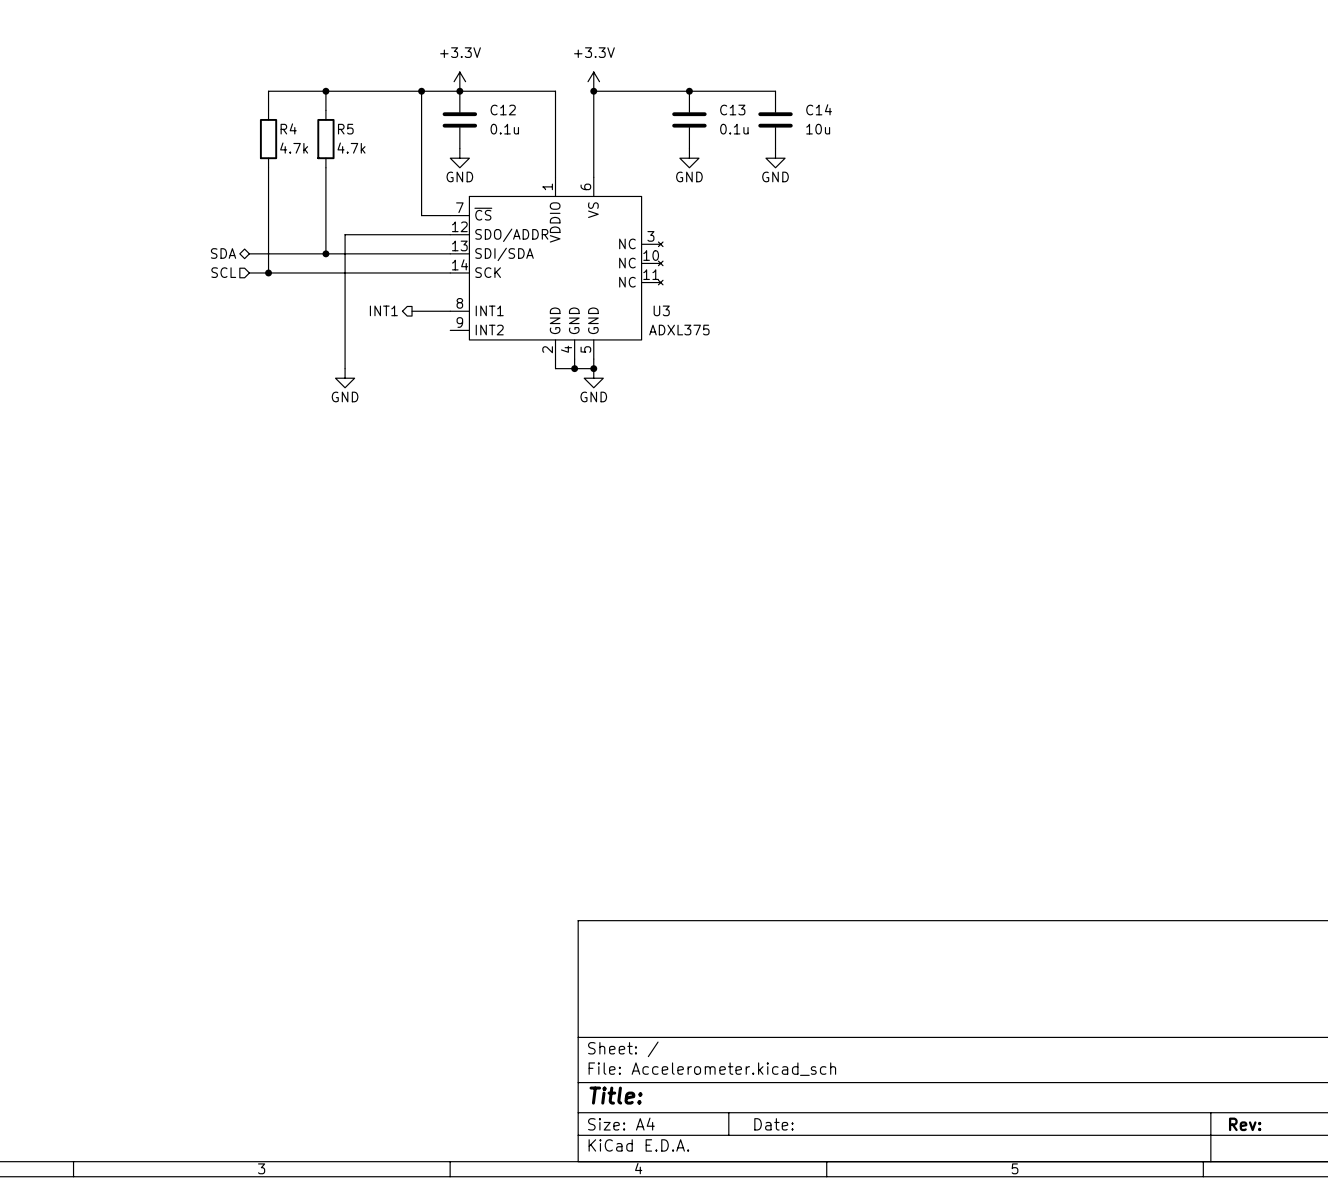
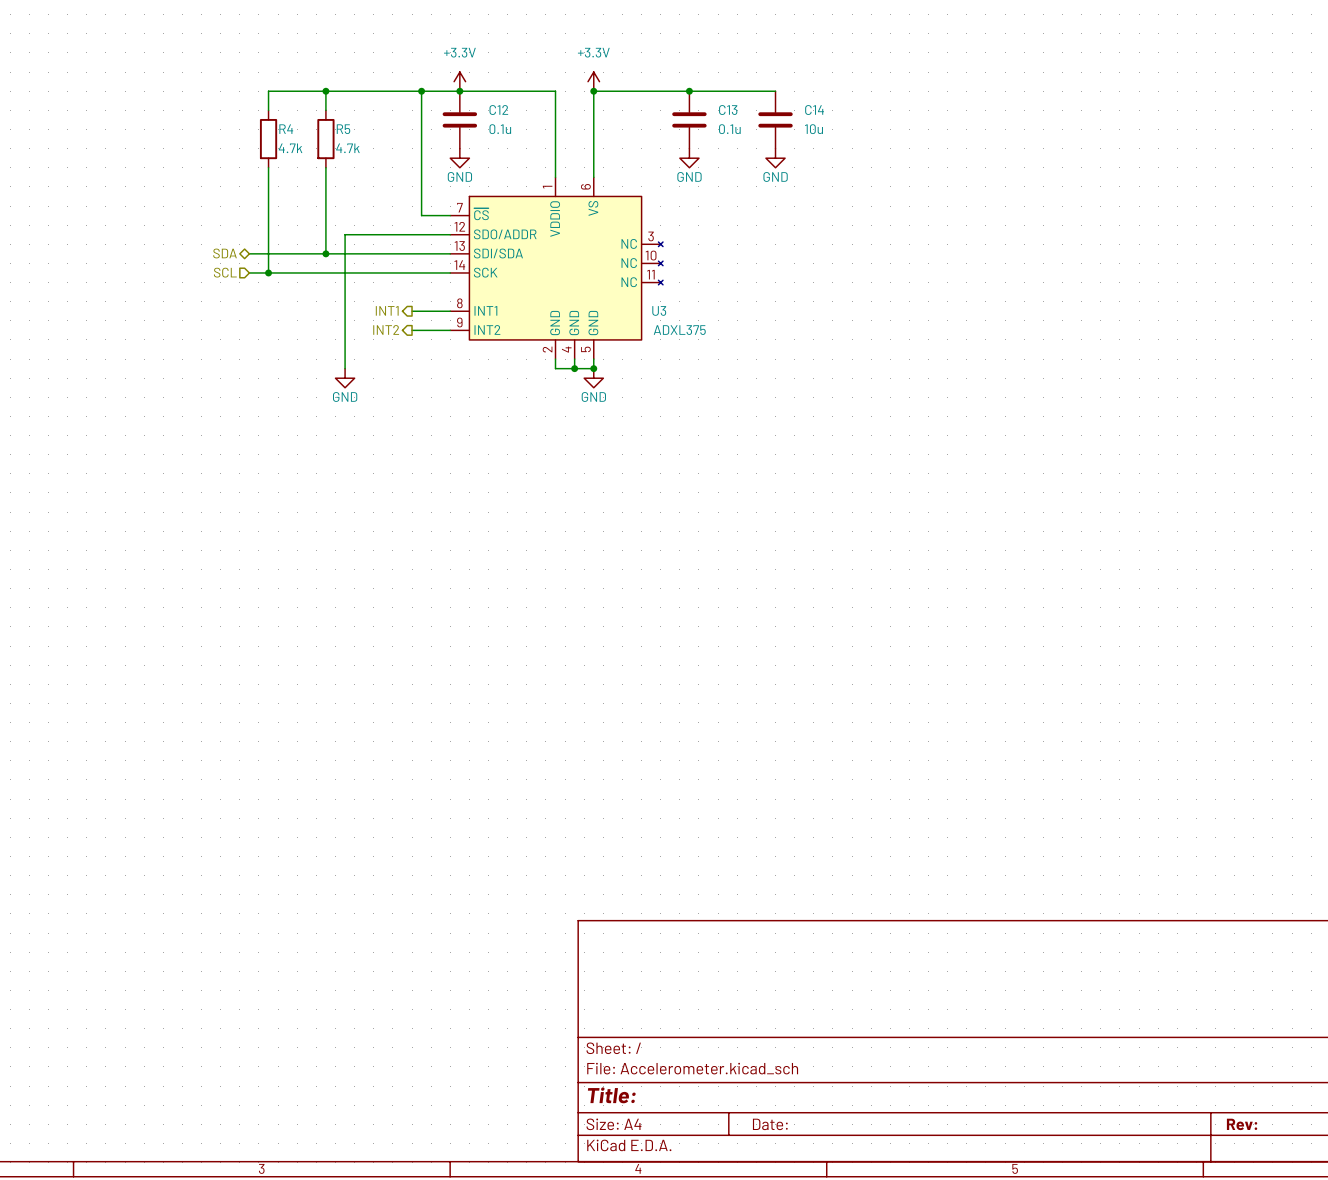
hierarchical label: none -> INT2 (386, 329)
wire: none -> (412, 330) (450, 330)

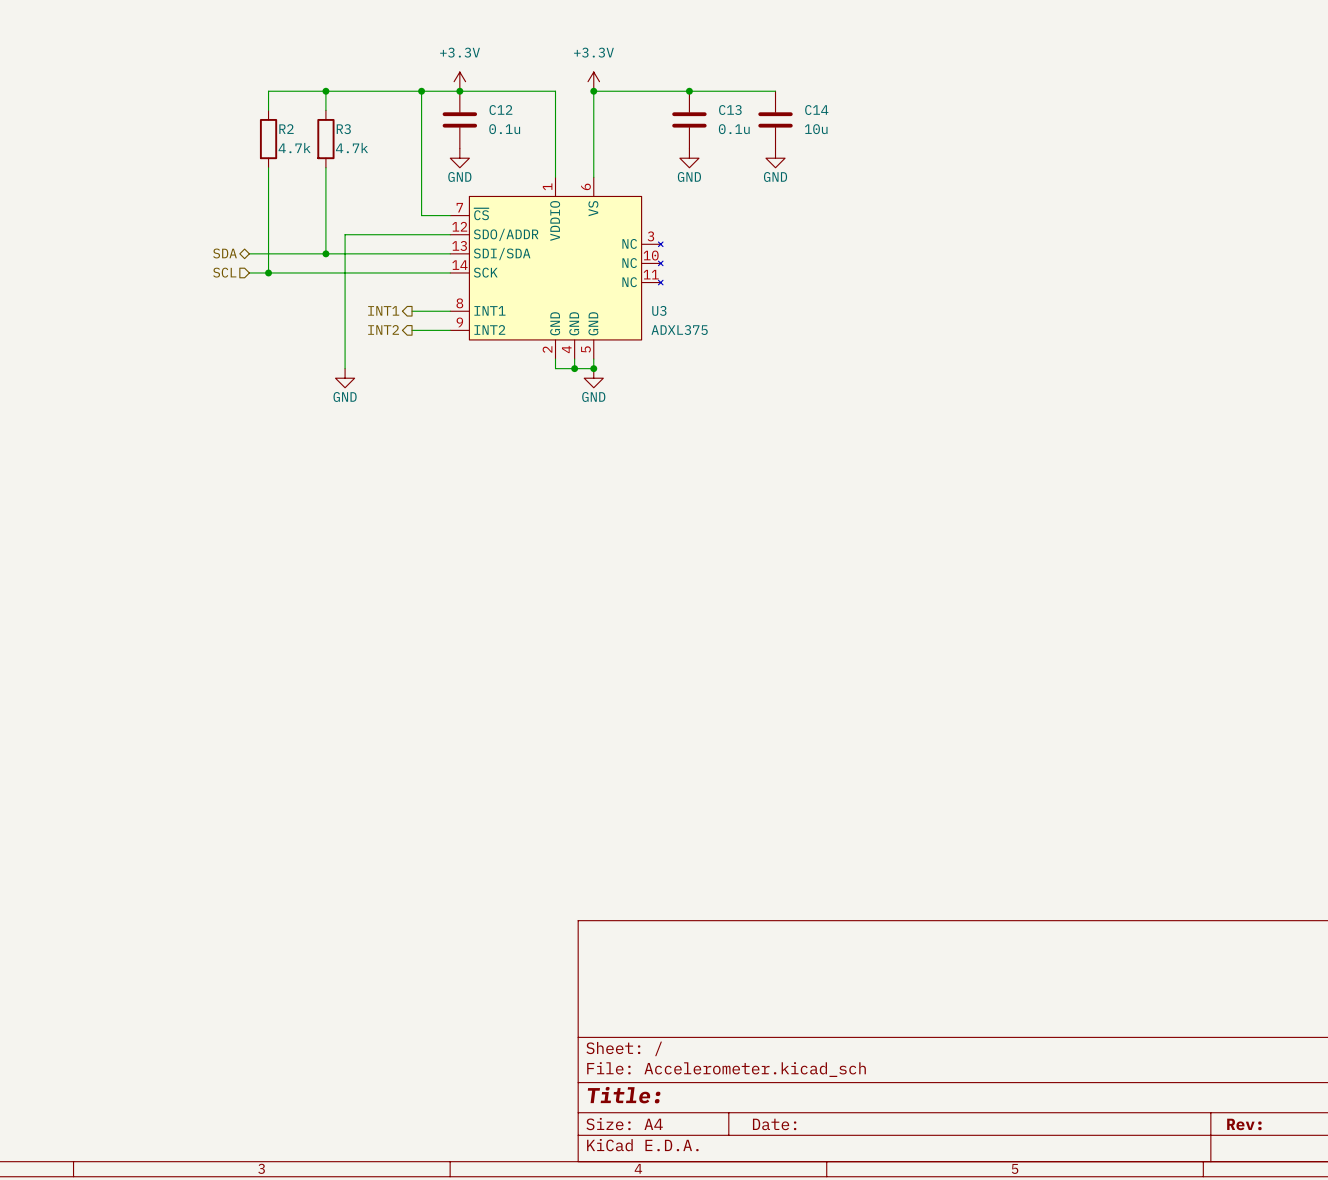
R4 name: R4 (286, 129) -> R2 (286, 129)
R5 name: R5 (343, 129) -> R3 (343, 129)

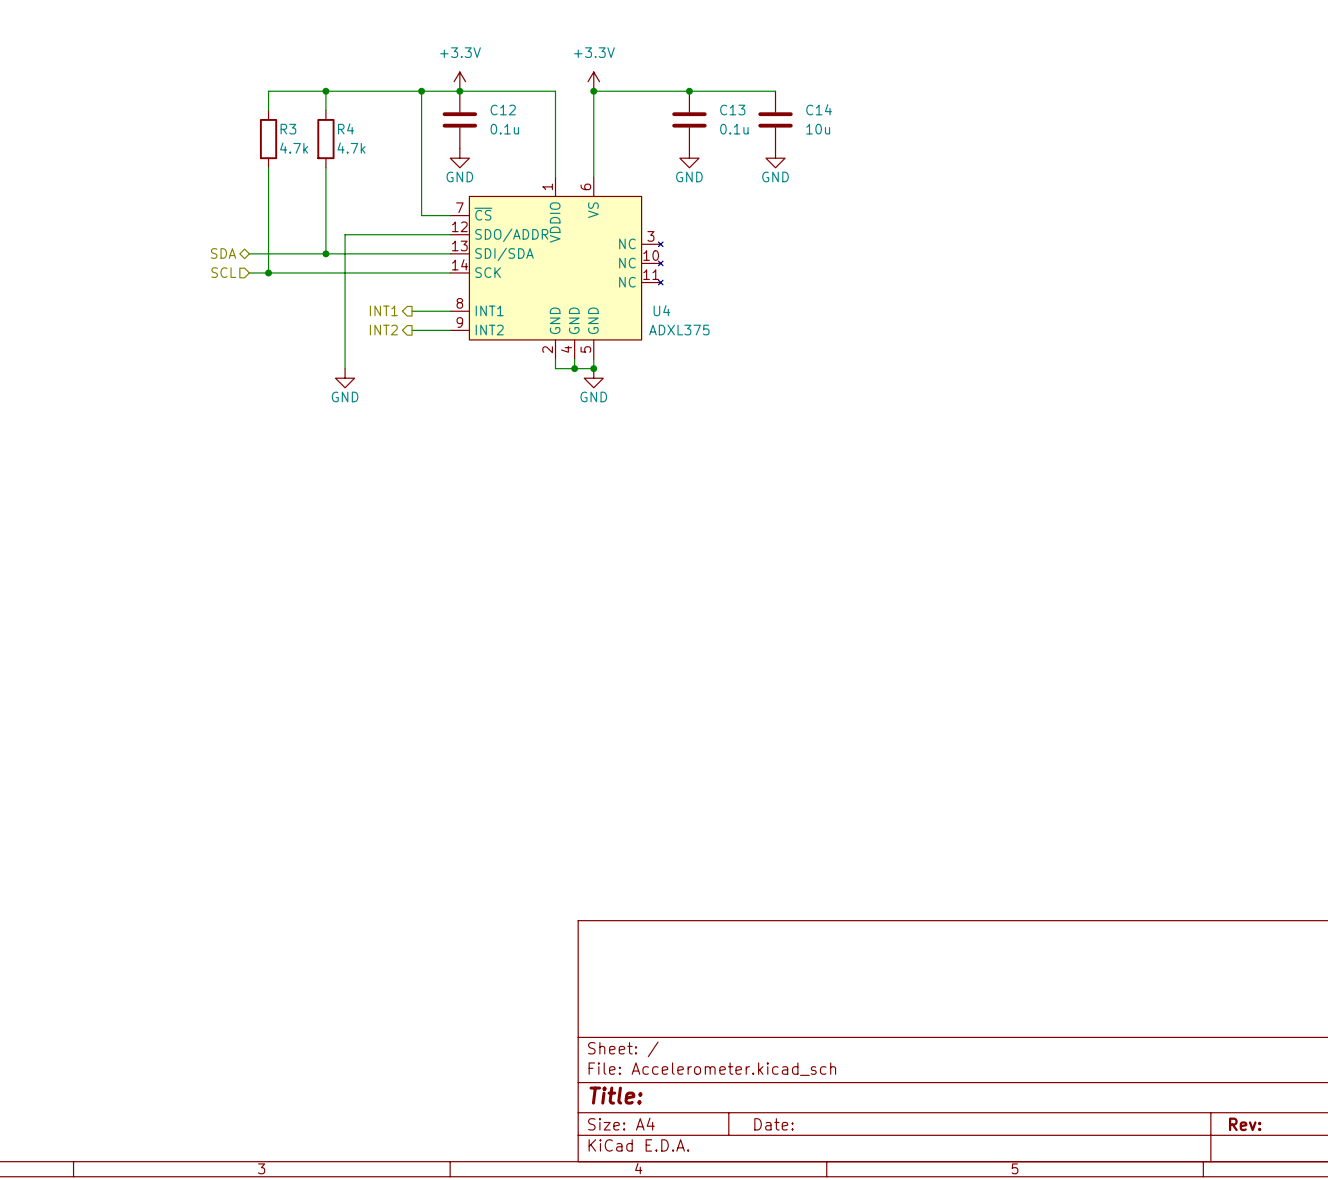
R2 name: R2 (286, 129) -> R3 (288, 129)
R3 name: R3 (343, 129) -> R4 (346, 128)
U3 name: U3 (659, 310) -> U4 (661, 310)

